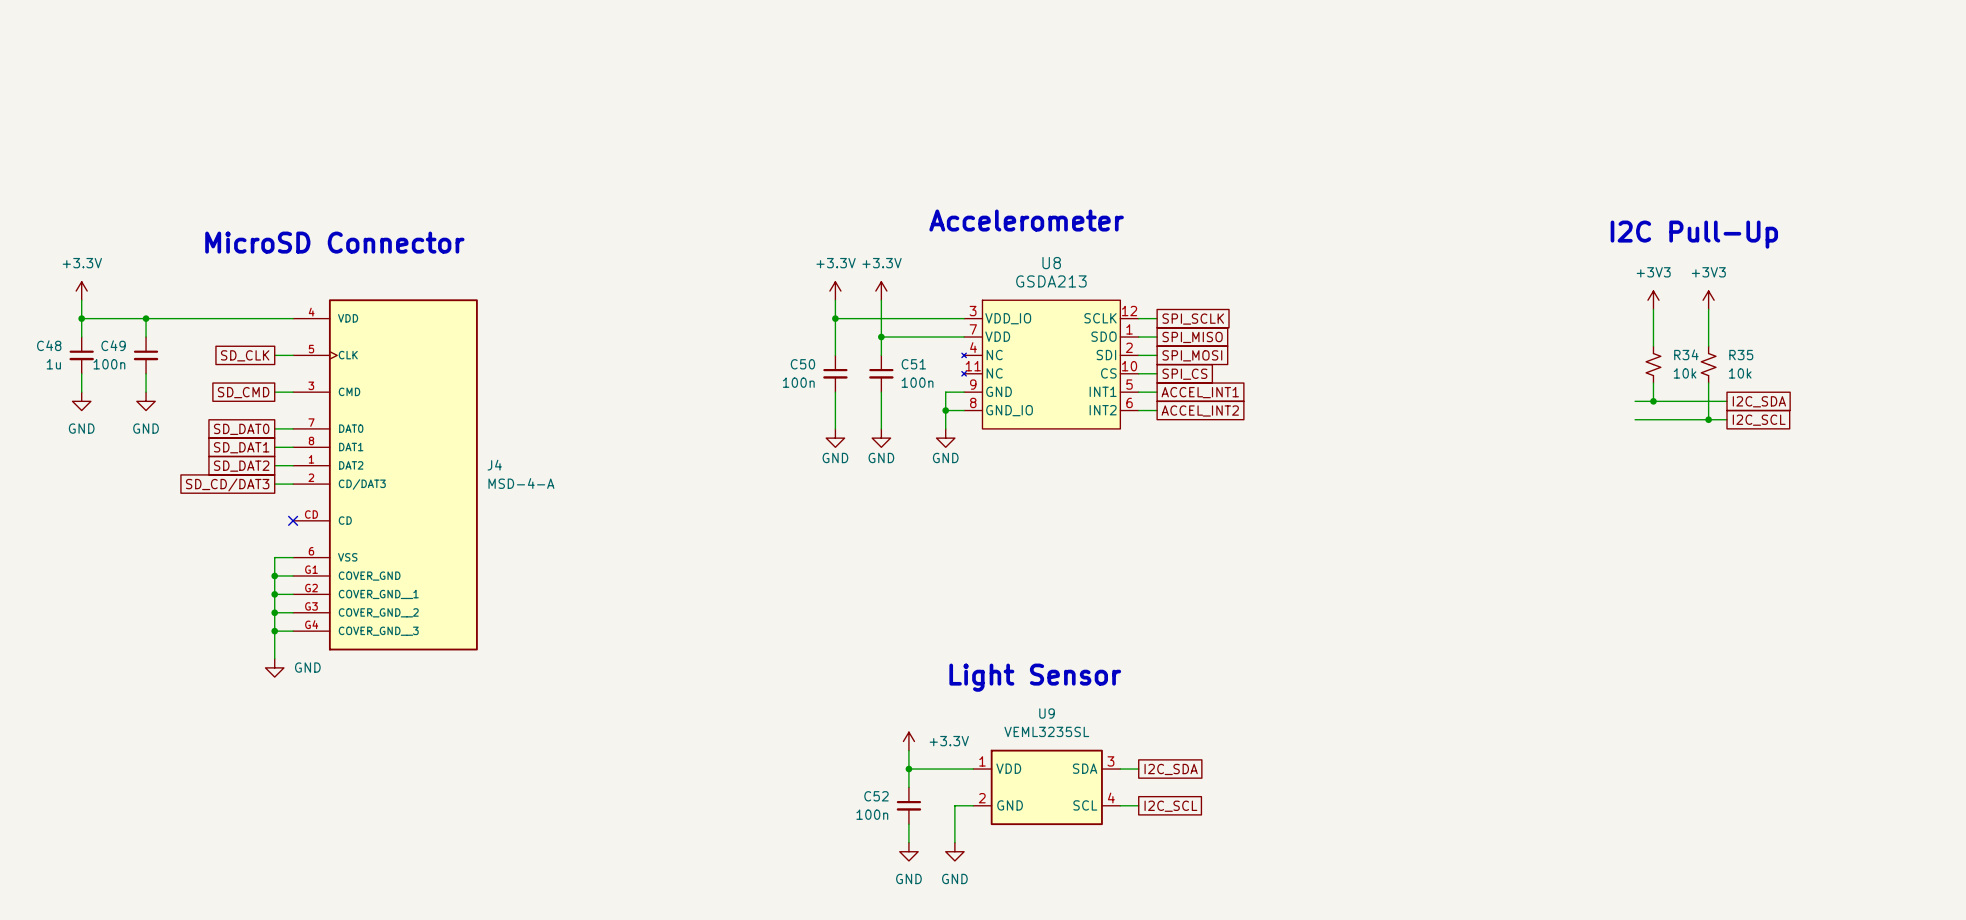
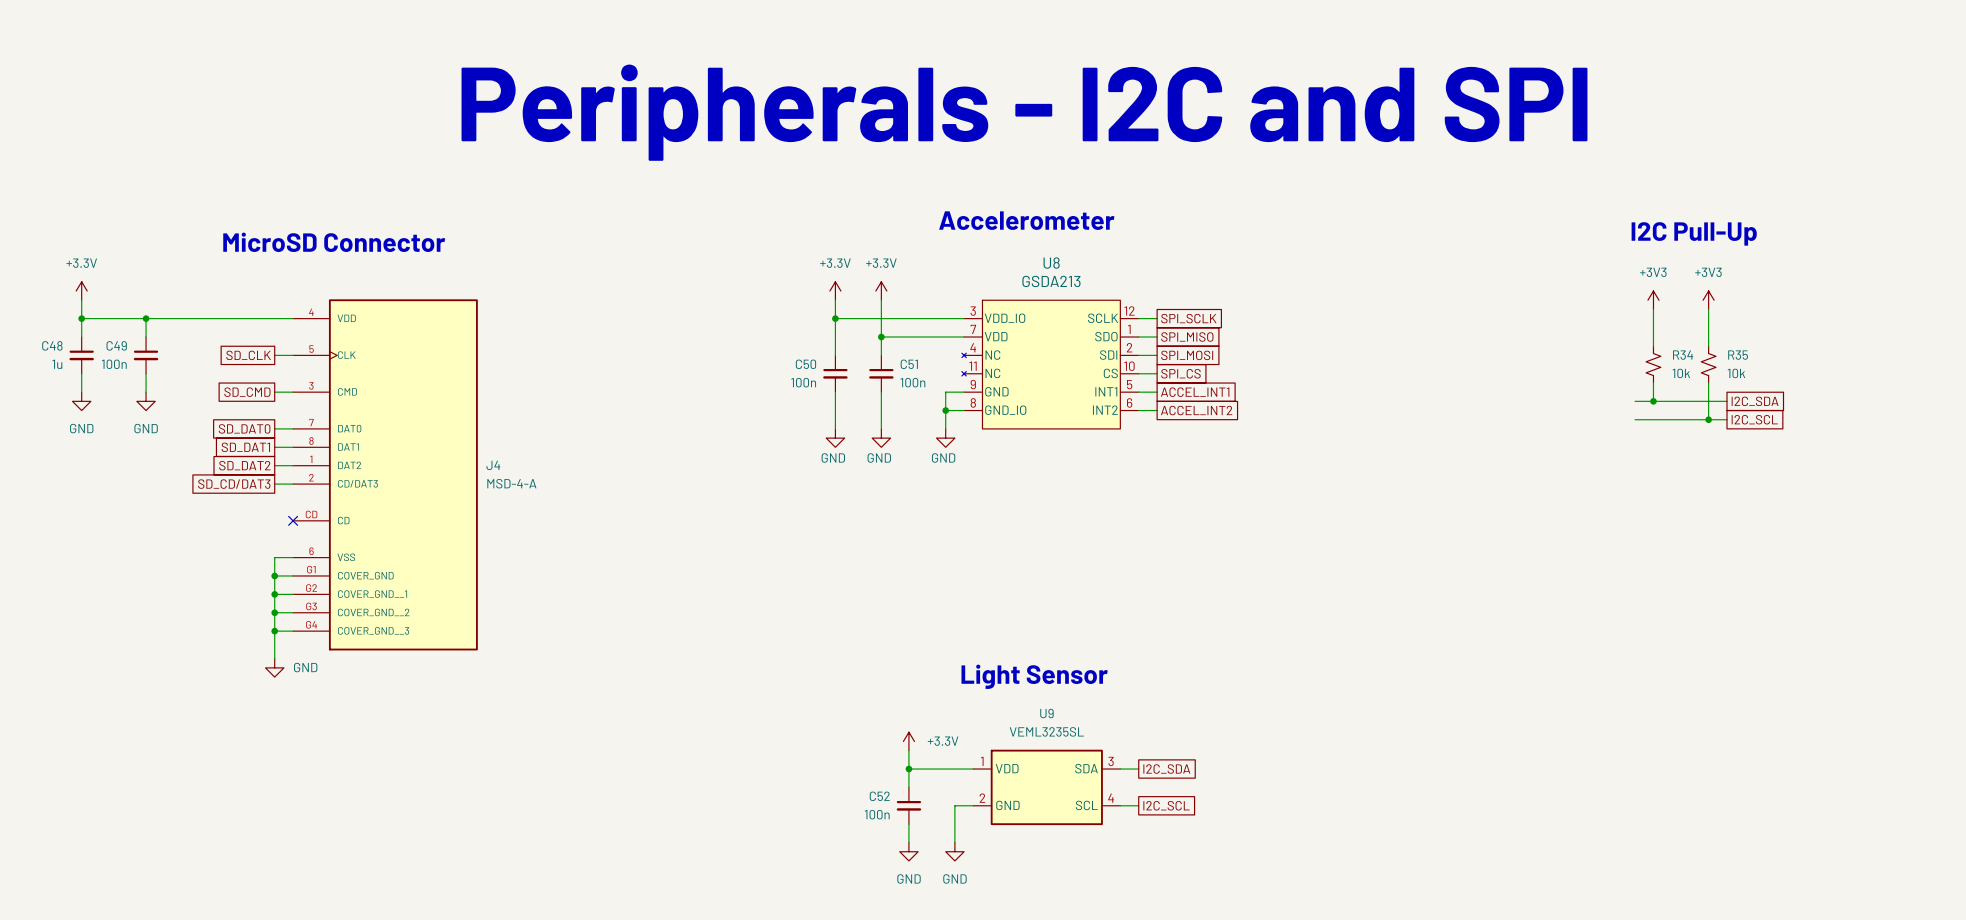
text: none -> Peripherals - I2C and SPI (1024, 112)

